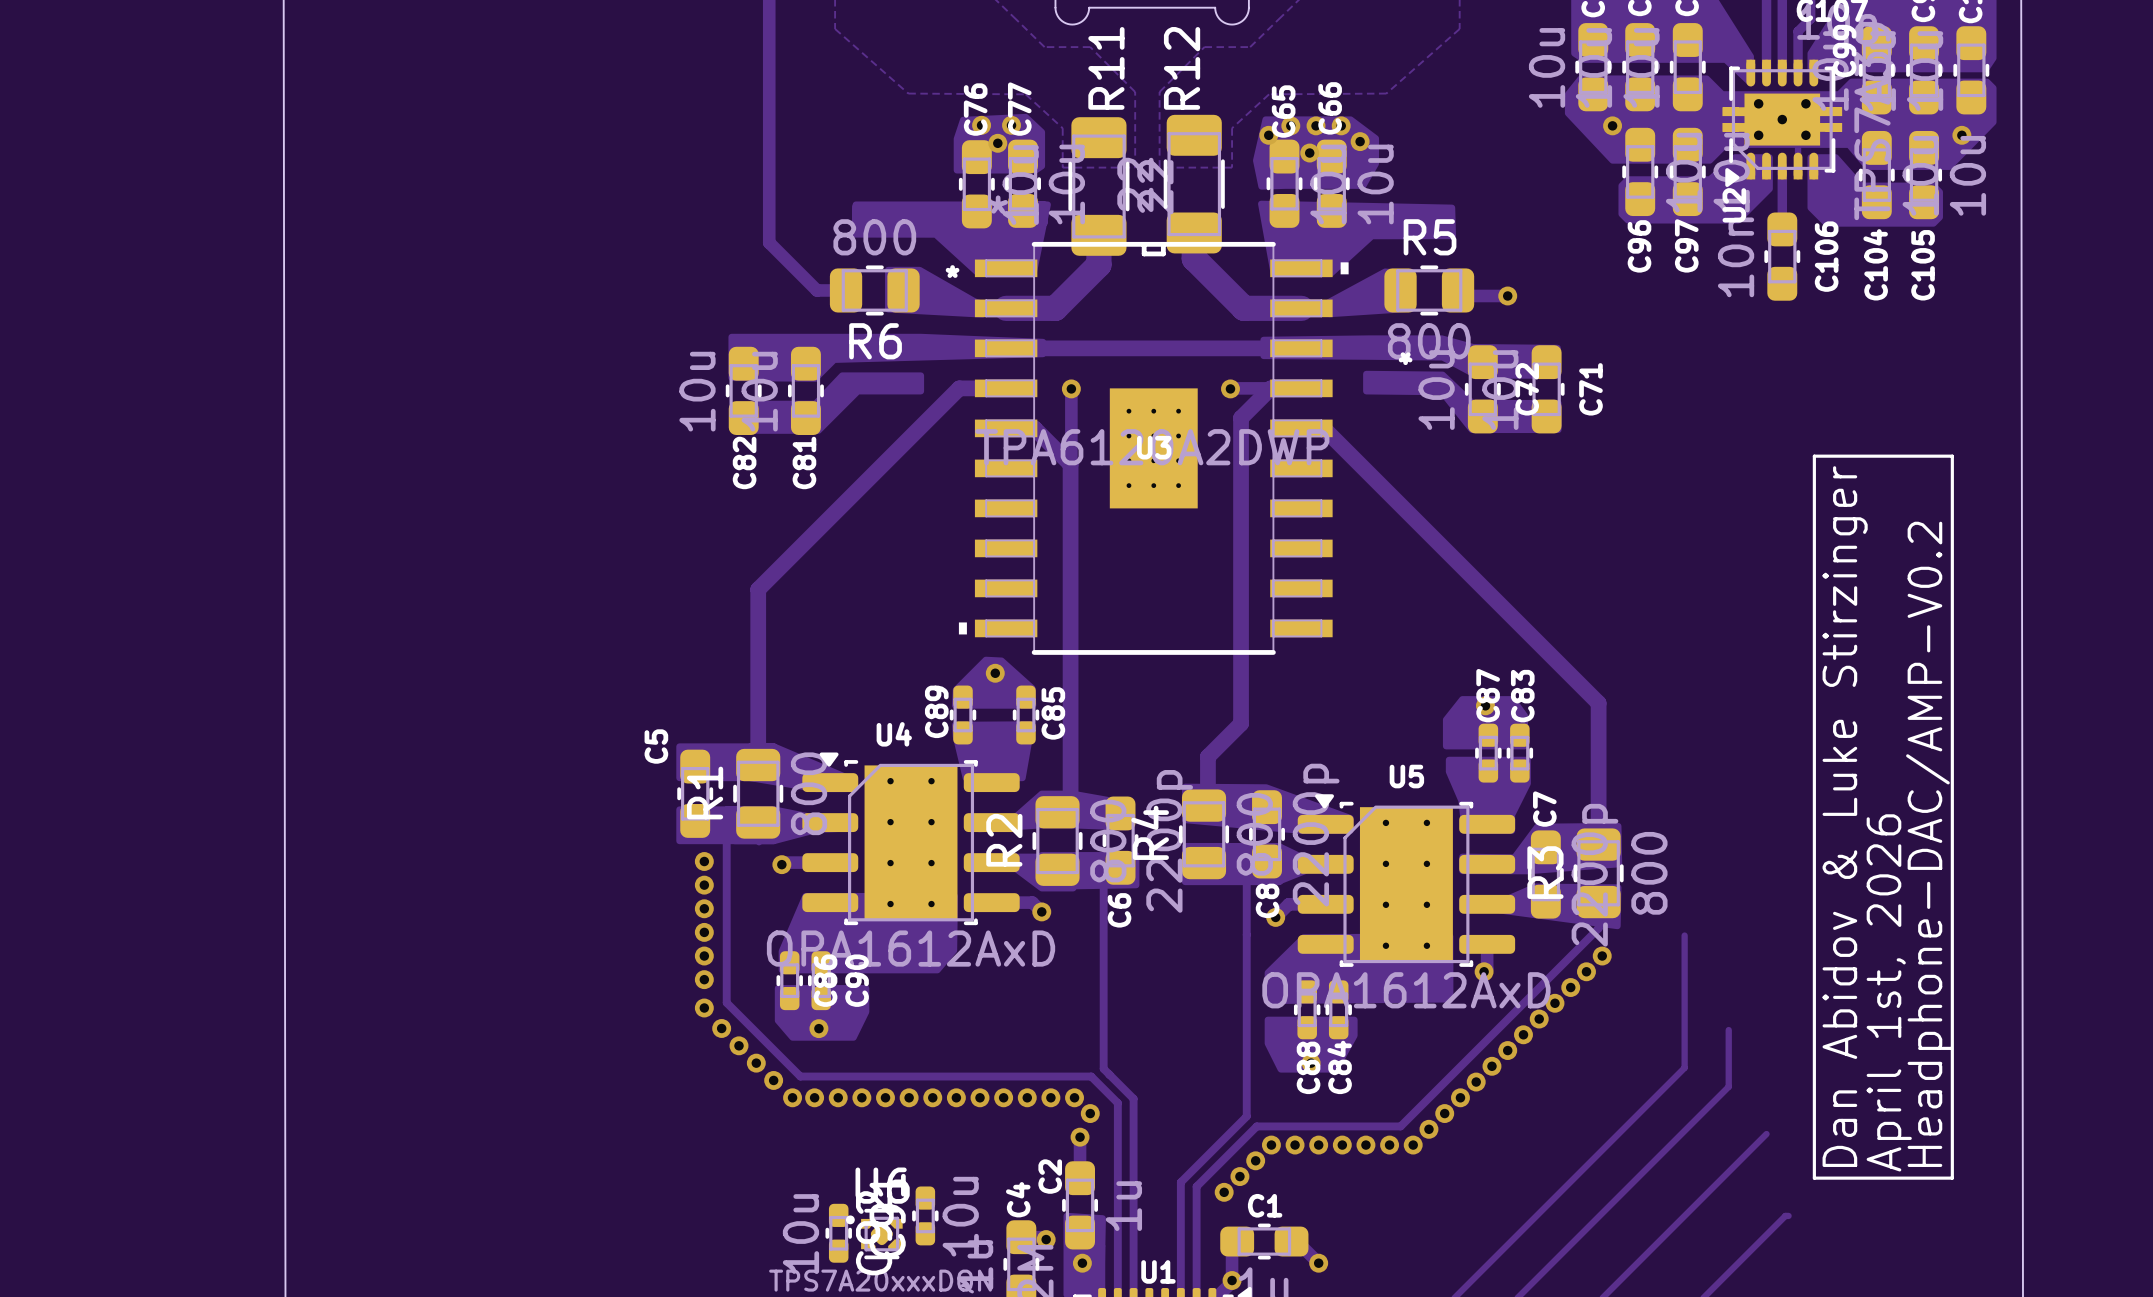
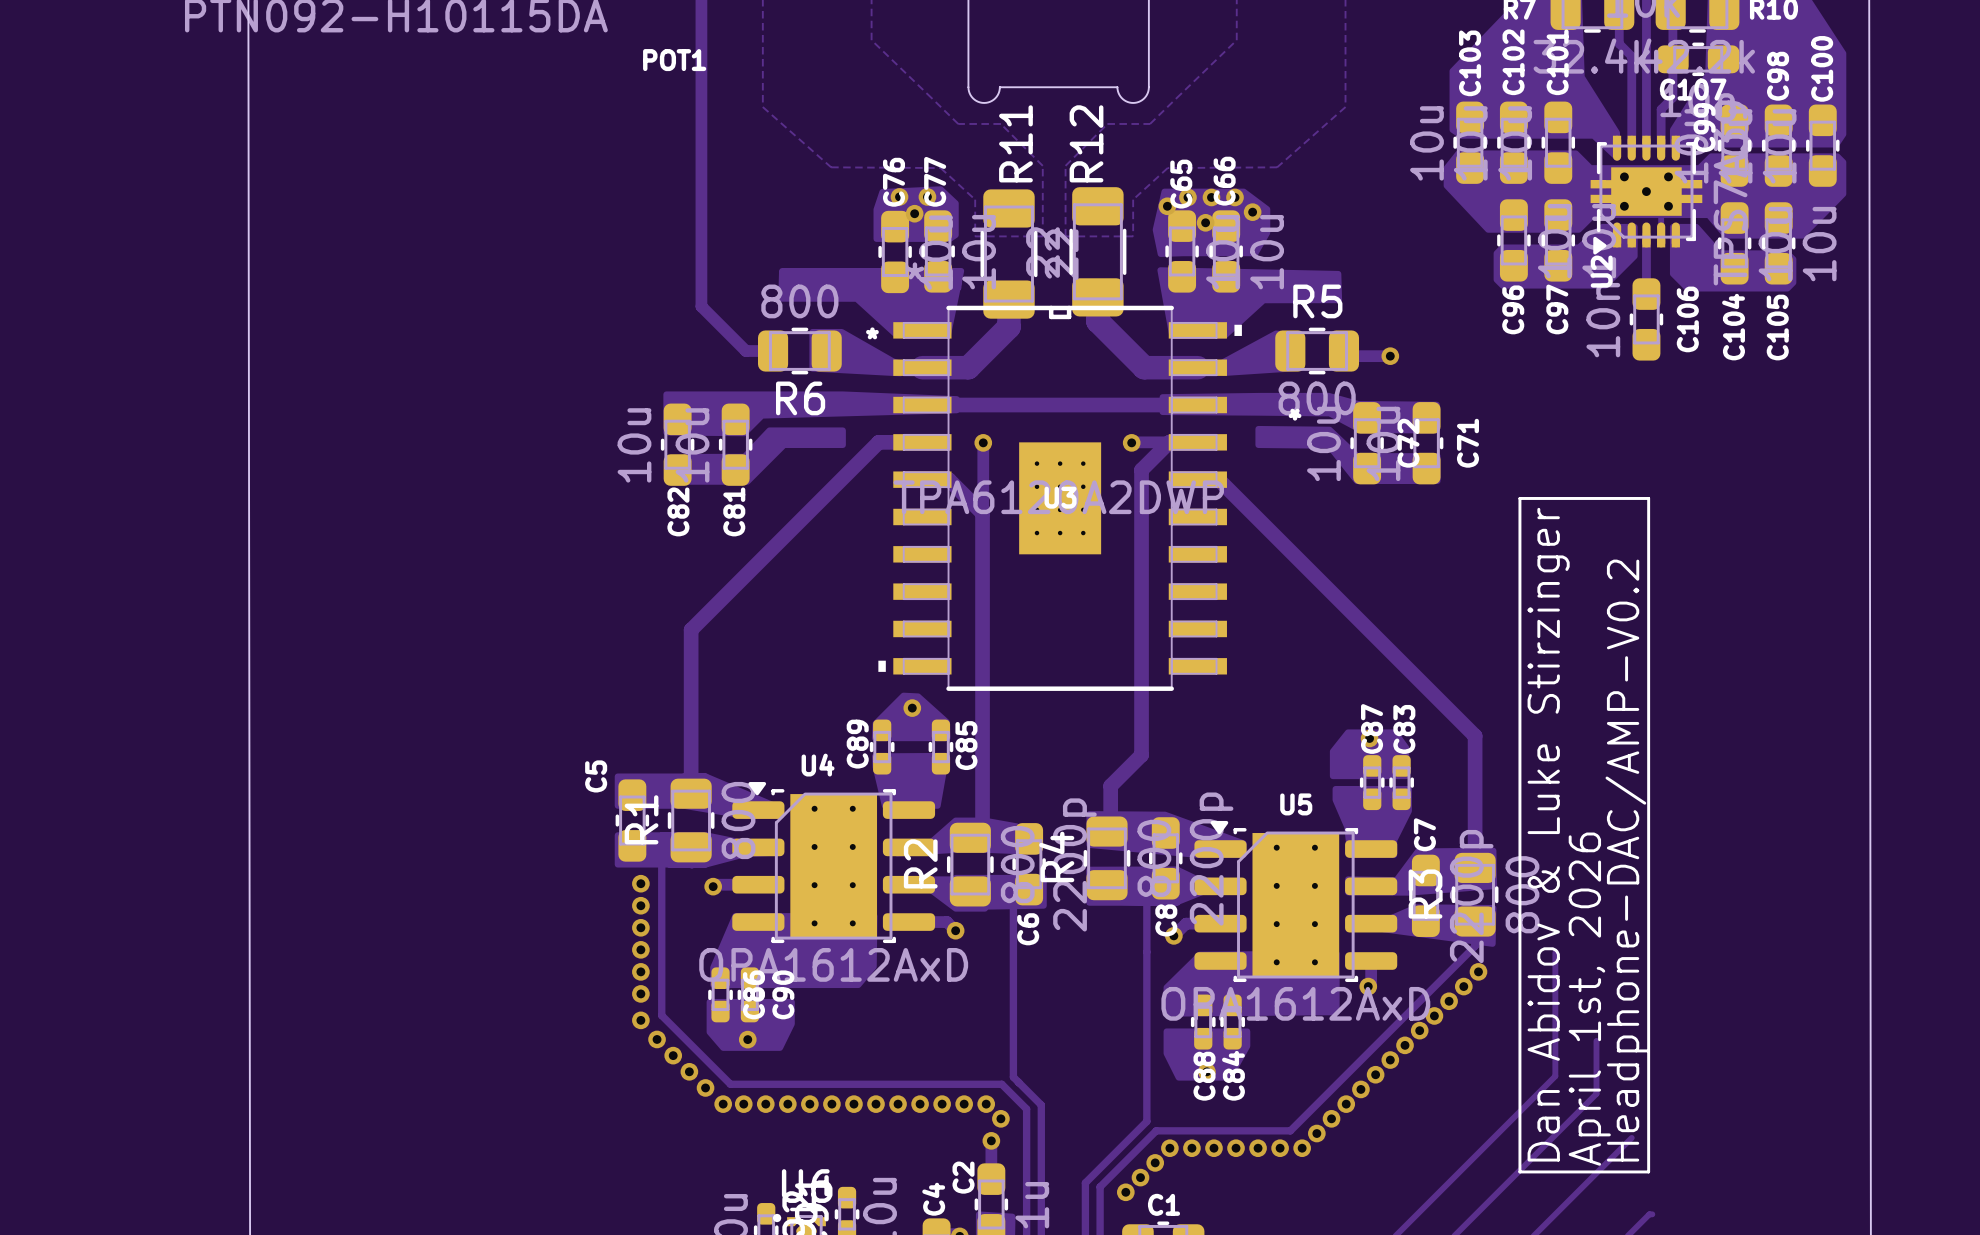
via: (1612, 125) -> none
via: (1961, 135) -> none
line: (1814, 456) (1952, 456) (1952, 1178) (1814, 1178) (1814, 456) -> (1519, 498) (1648, 498) (1648, 1171) (1519, 1171) (1519, 498)
text position: Dan Abidov & Luke Stirzinger (1845, 816) -> Dan Abidov & Luke Stirzinger (1548, 834)
text position: Headphone-DAC/AMP-V0.2 (1929, 844) -> Headphone-DAC/AMP-V0.2 (1627, 860)
text position: April 1st, 2026 (1889, 992) -> April 1st, 2026 (1589, 999)

